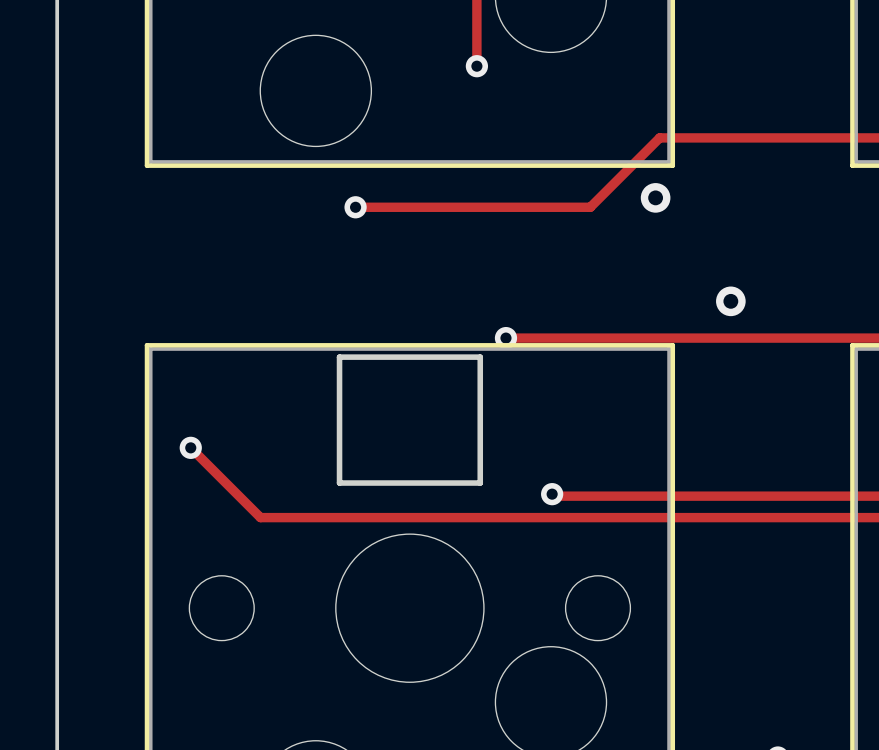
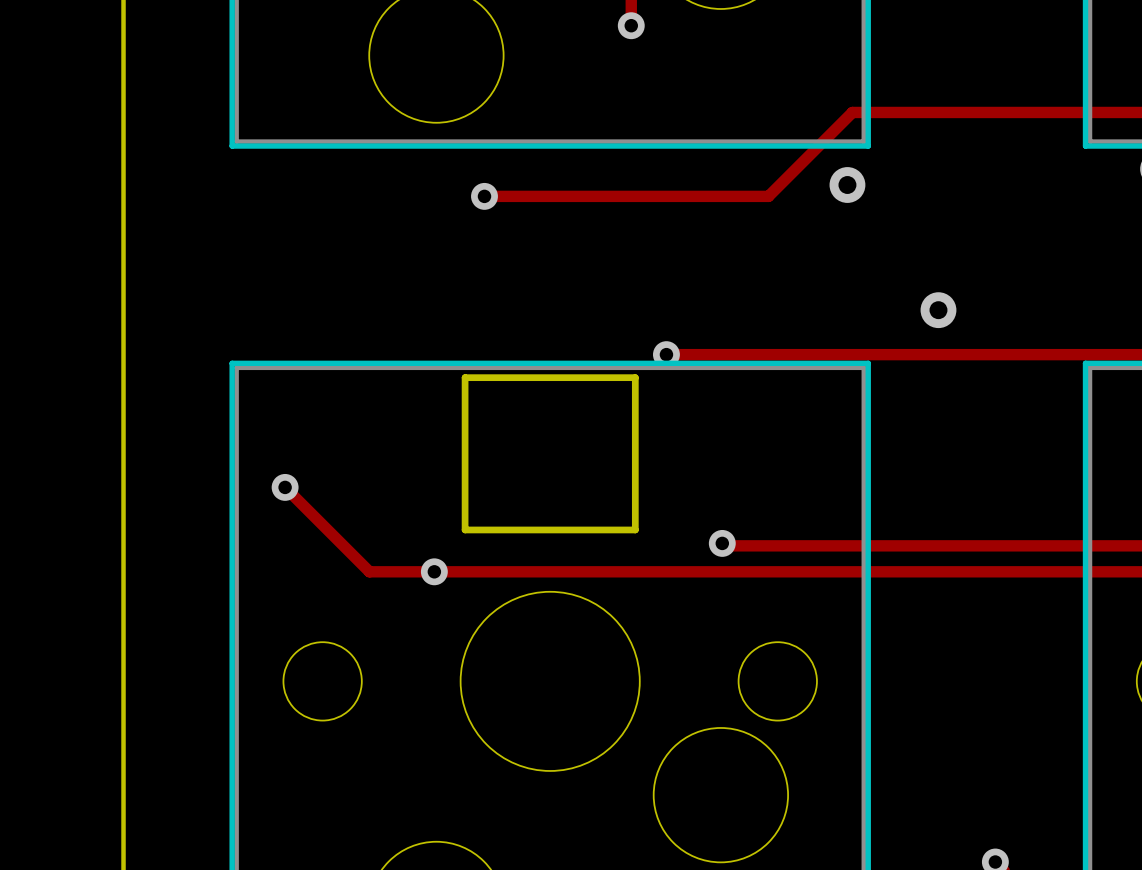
via: none -> (434, 571)

